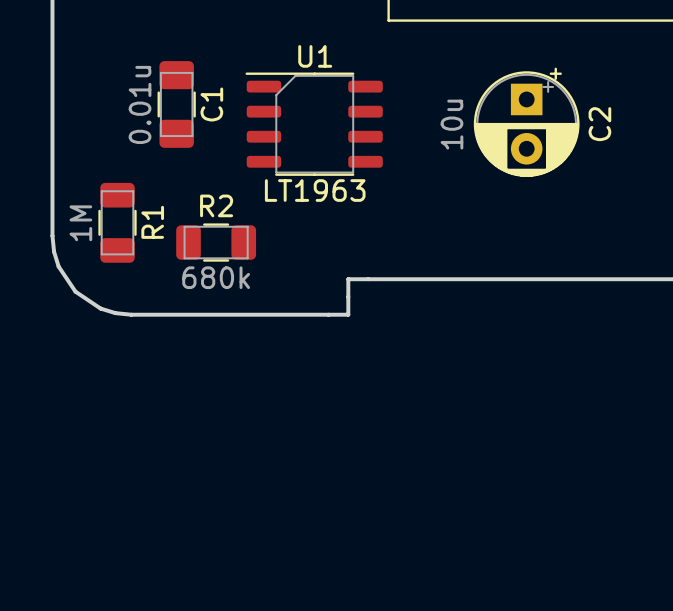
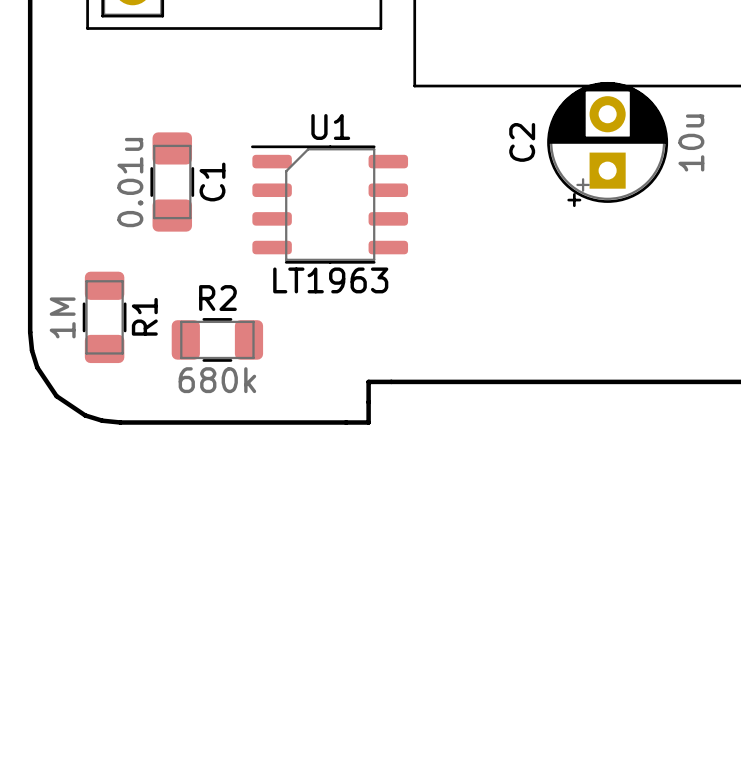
C2 rotation: 0° (526, 122) -> 180° (607, 144)

